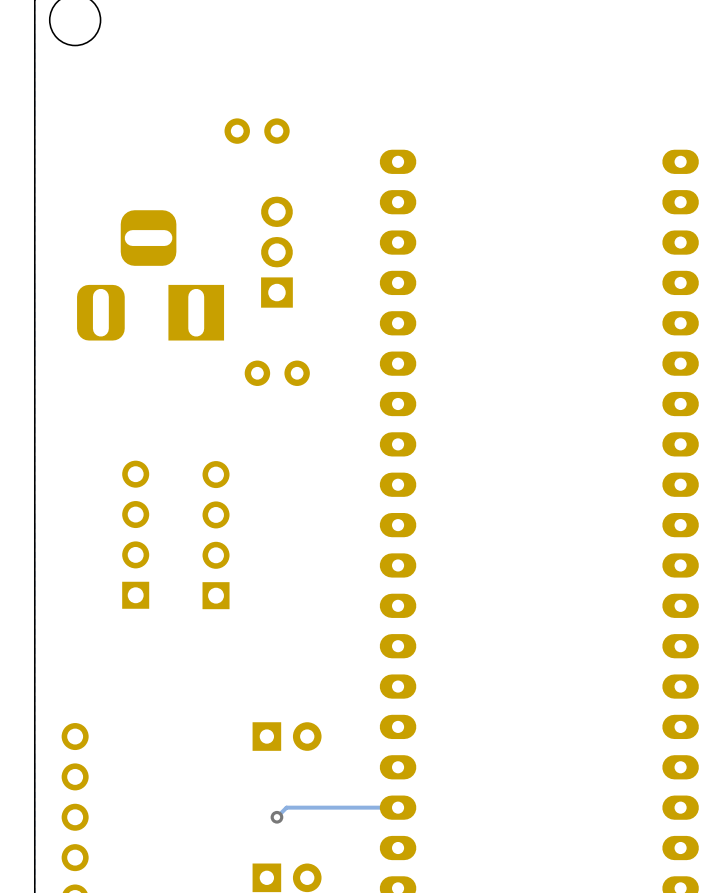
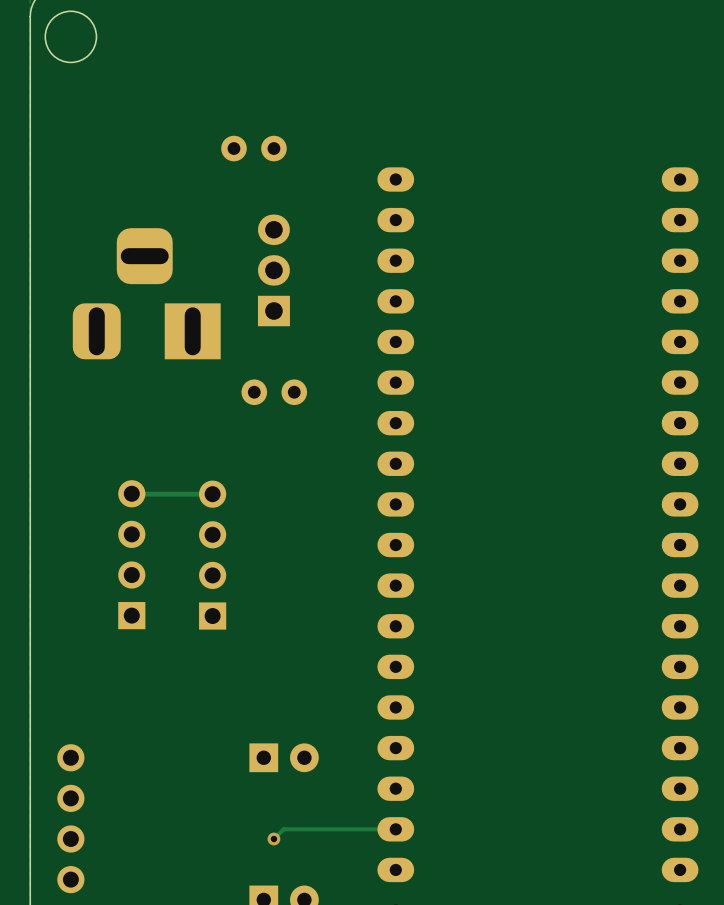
track: none -> (131, 493) (212, 494)

